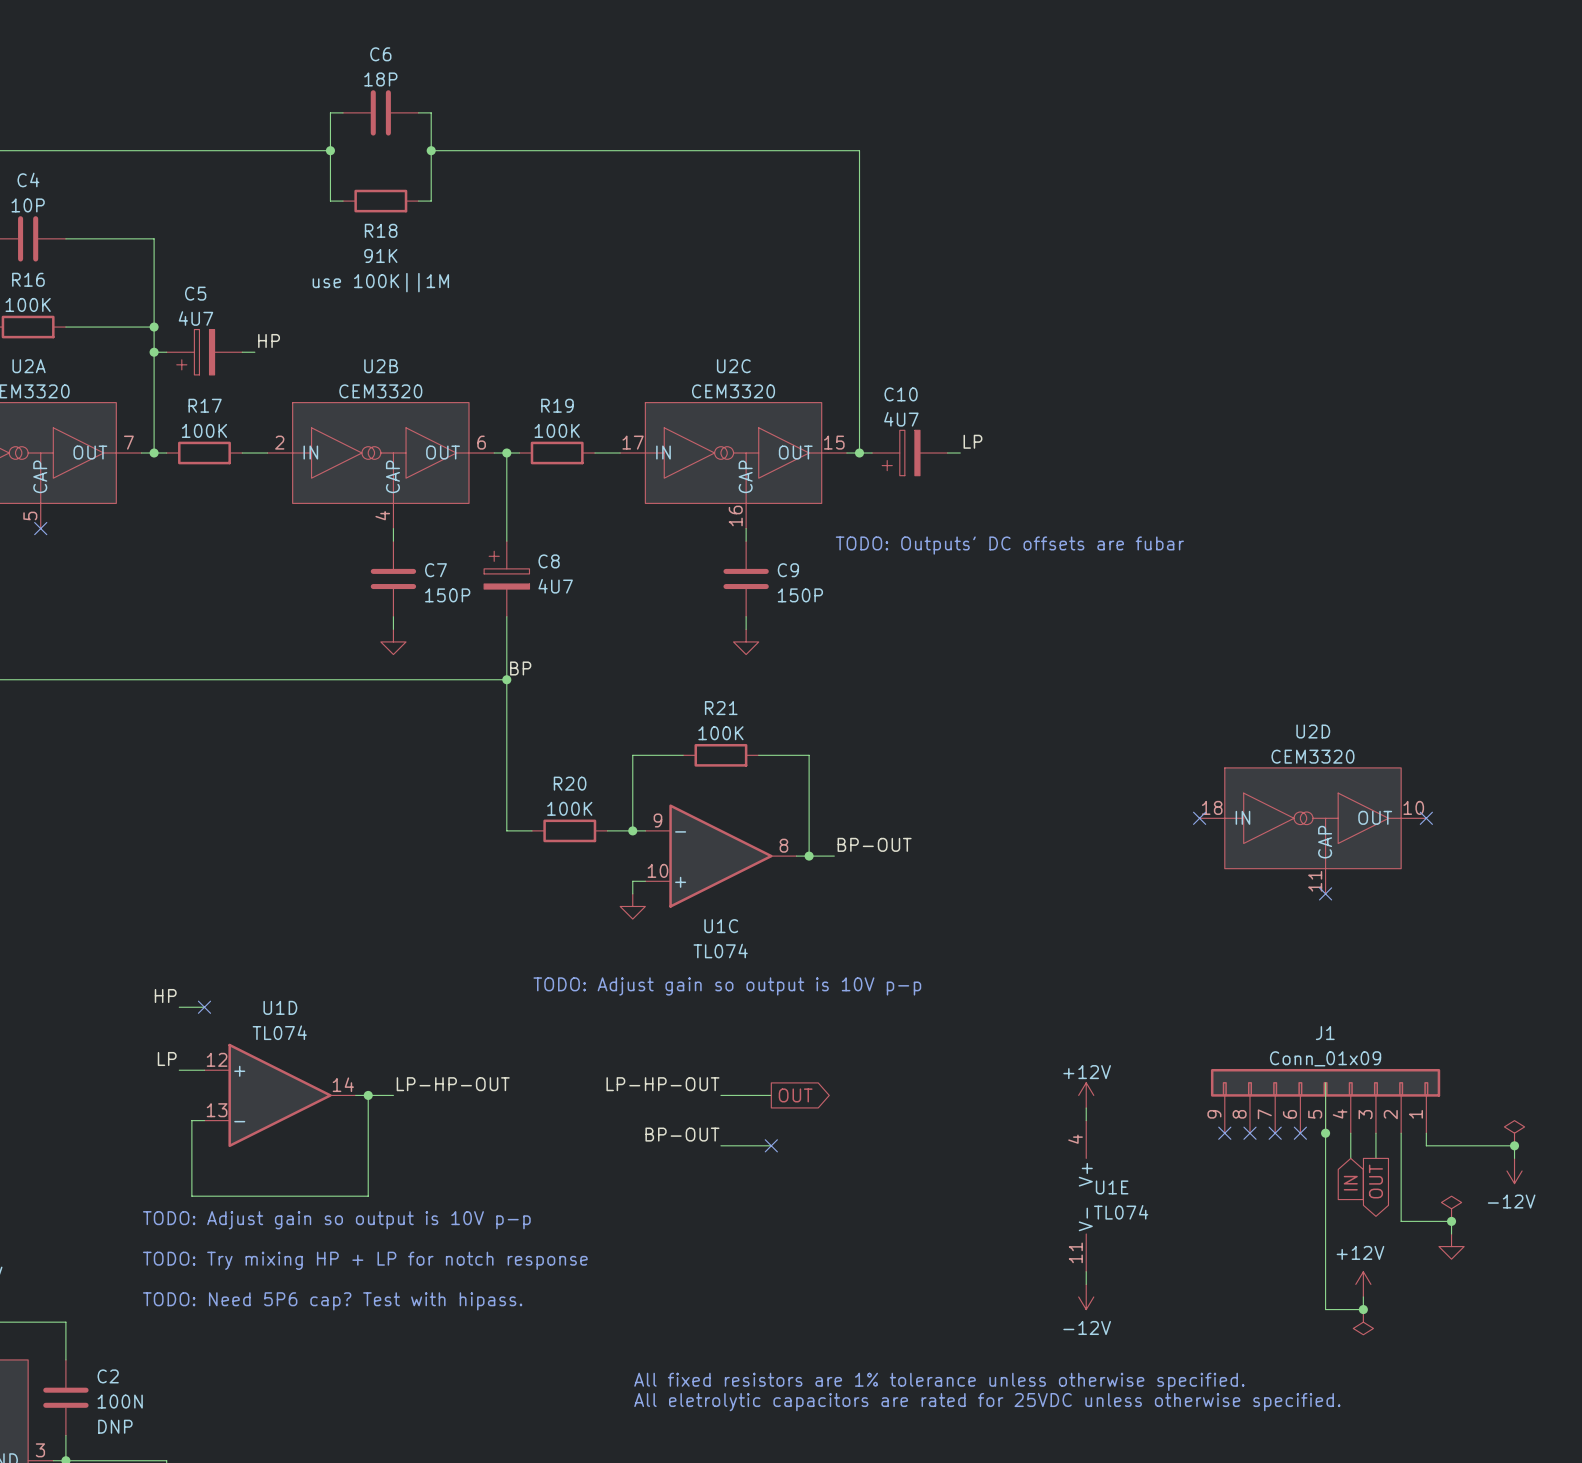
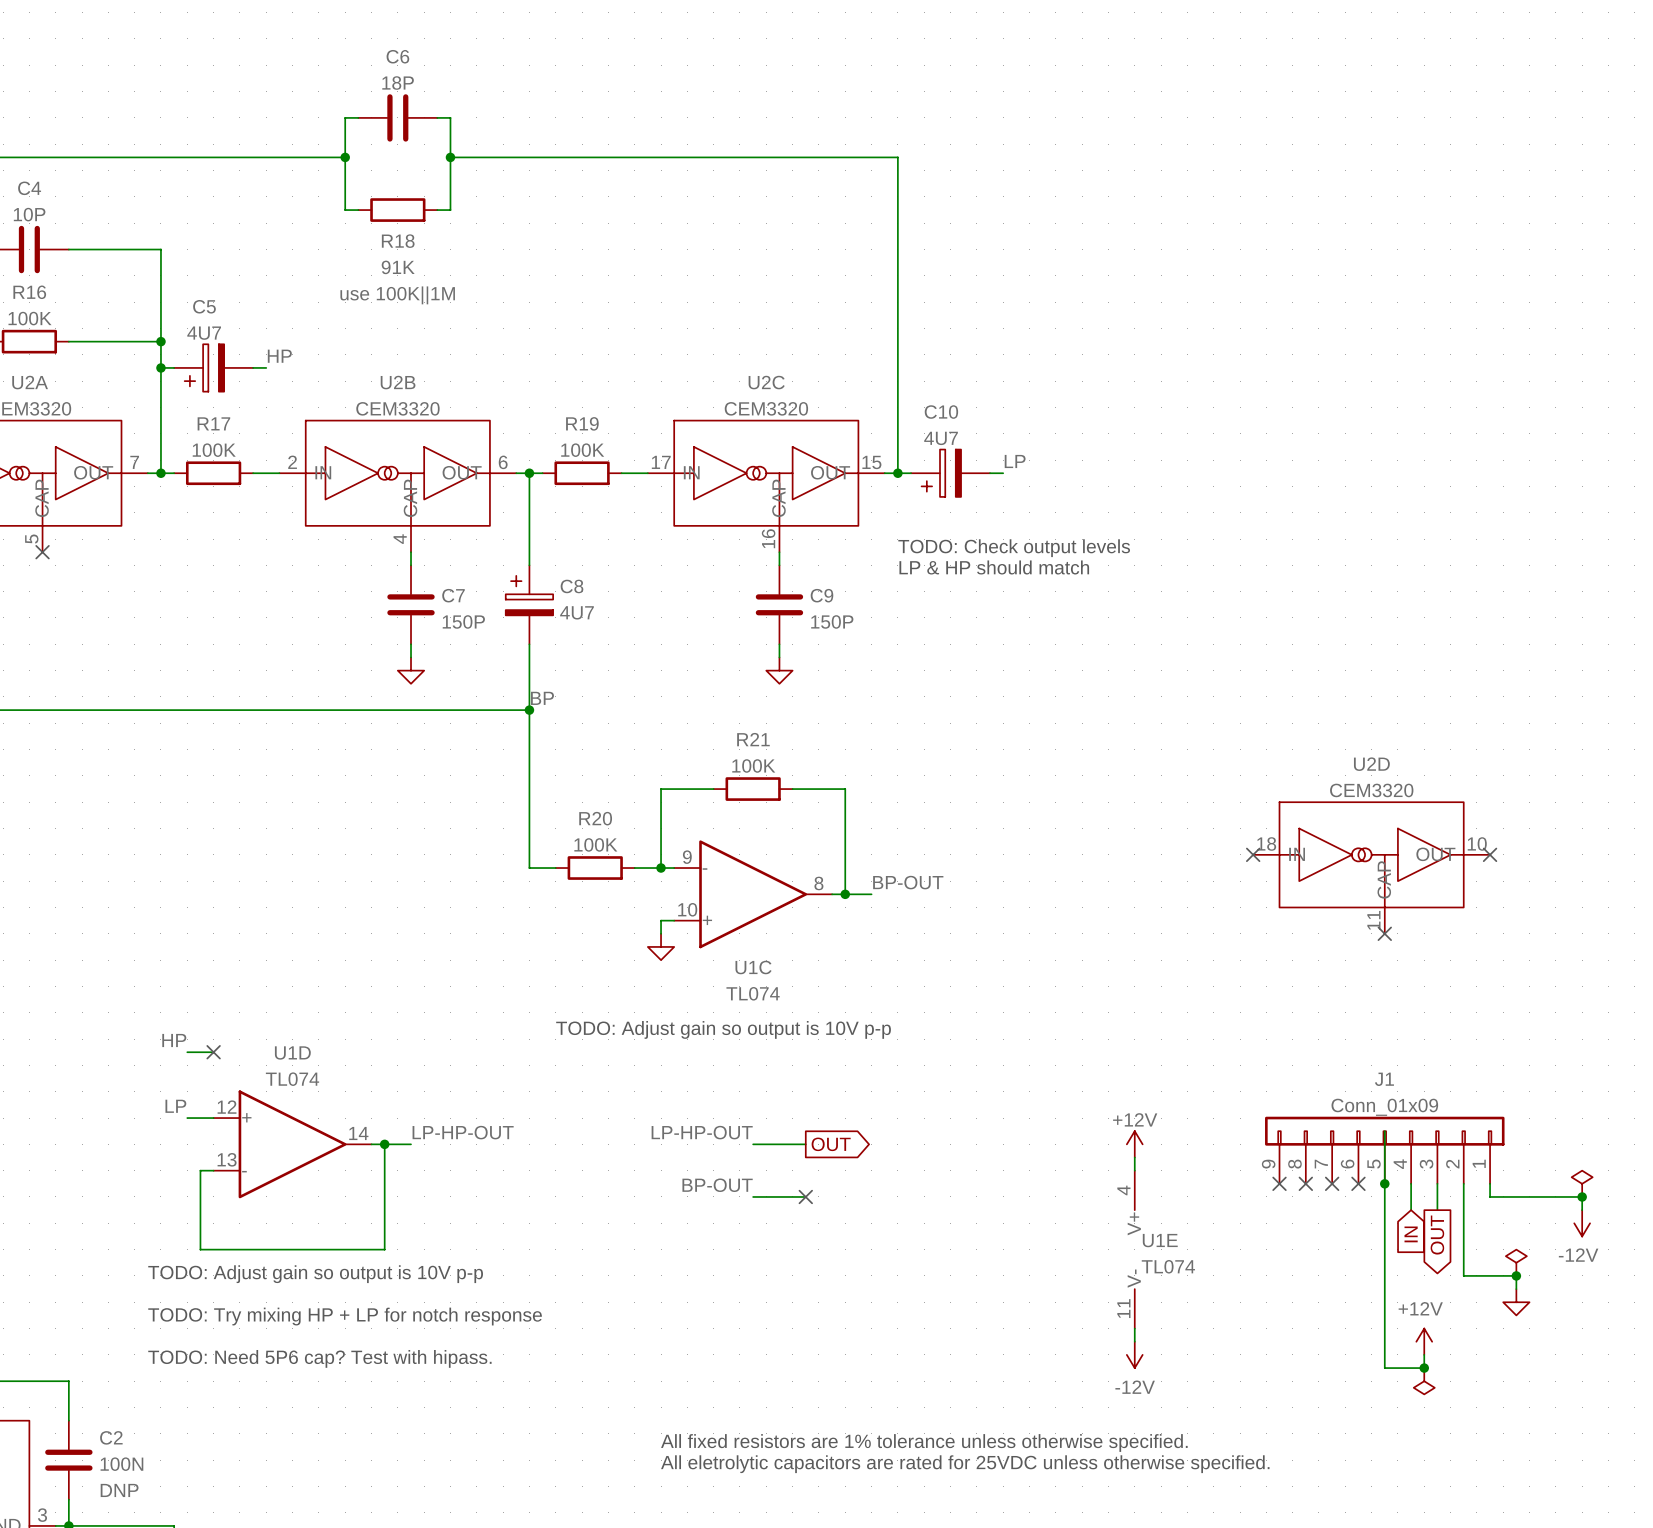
text: none -> TODO: Check output levels (1014, 548)
text: none -> LP & HP should match (994, 567)
text: TODO: Outputs' DC offsets are fubar (1009, 545) -> none

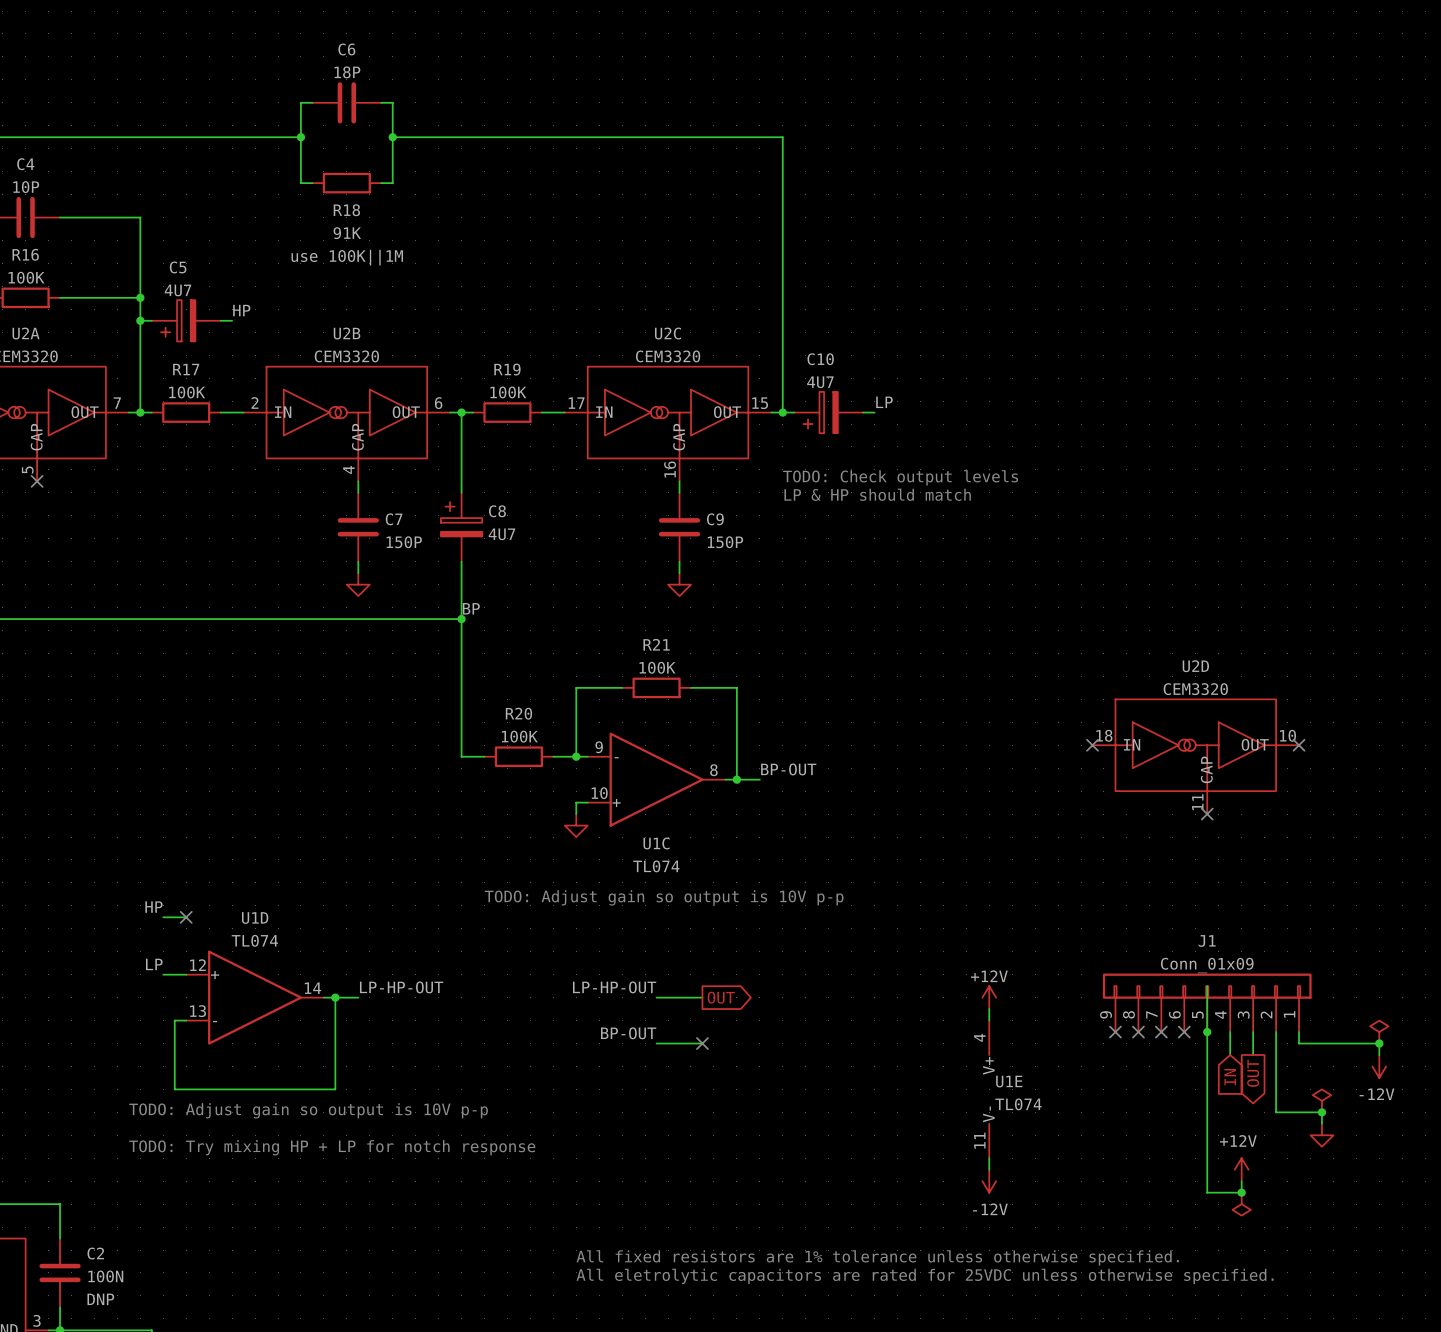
text: TODO: Need 5P6 cap? Test with hipass. (319, 1358) -> none

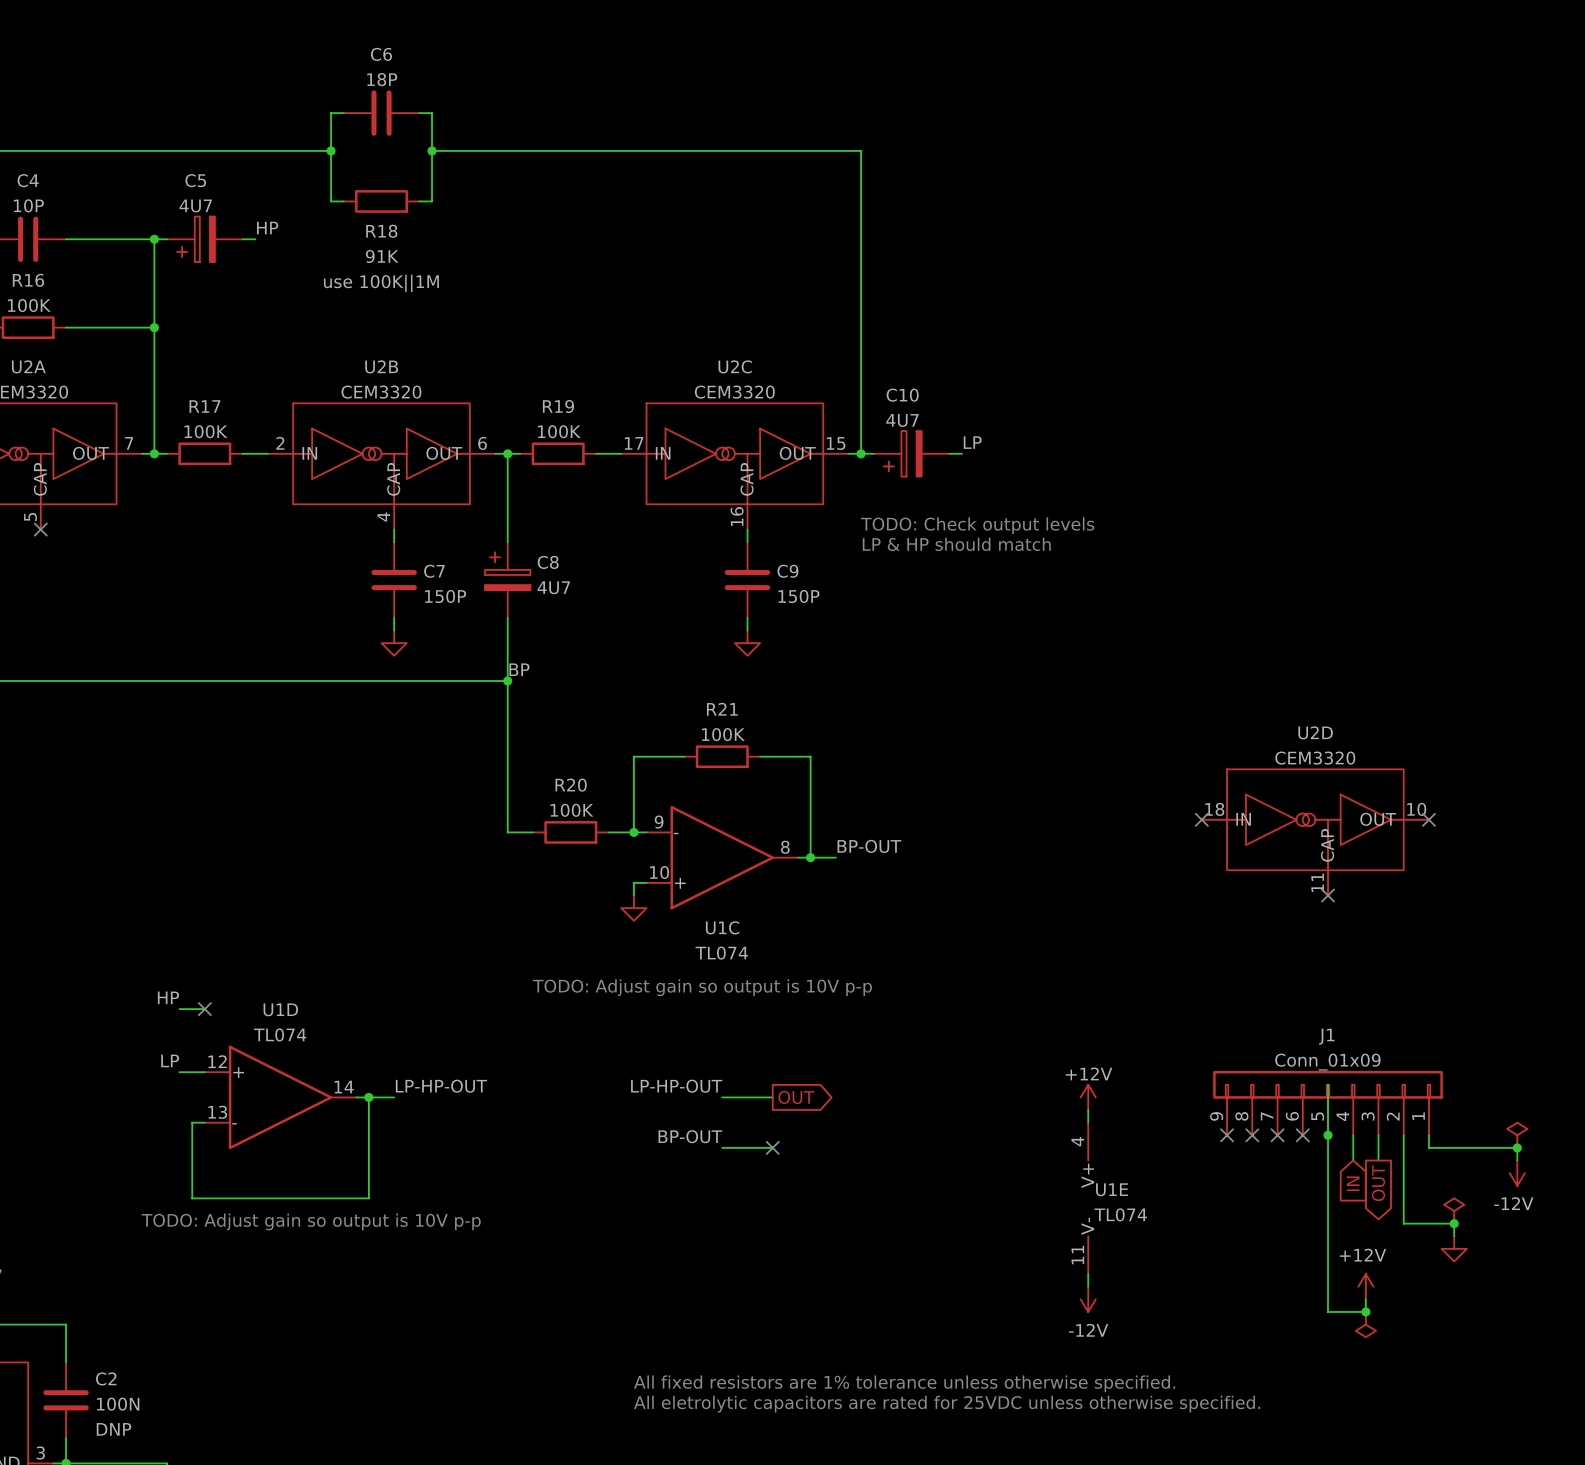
junction: none -> (154, 239)
label position: HP (241, 310) -> HP (267, 228)
wire: (140, 320) (151, 320) -> (154, 239) (167, 239)
junction: (140, 320) -> none
C5 position: (186, 320) -> (204, 239)
wire: (220, 320) (232, 320) -> (242, 239) (255, 239)
text: TODO: Try mixing HP + LP for notch response (332, 1147) -> none

